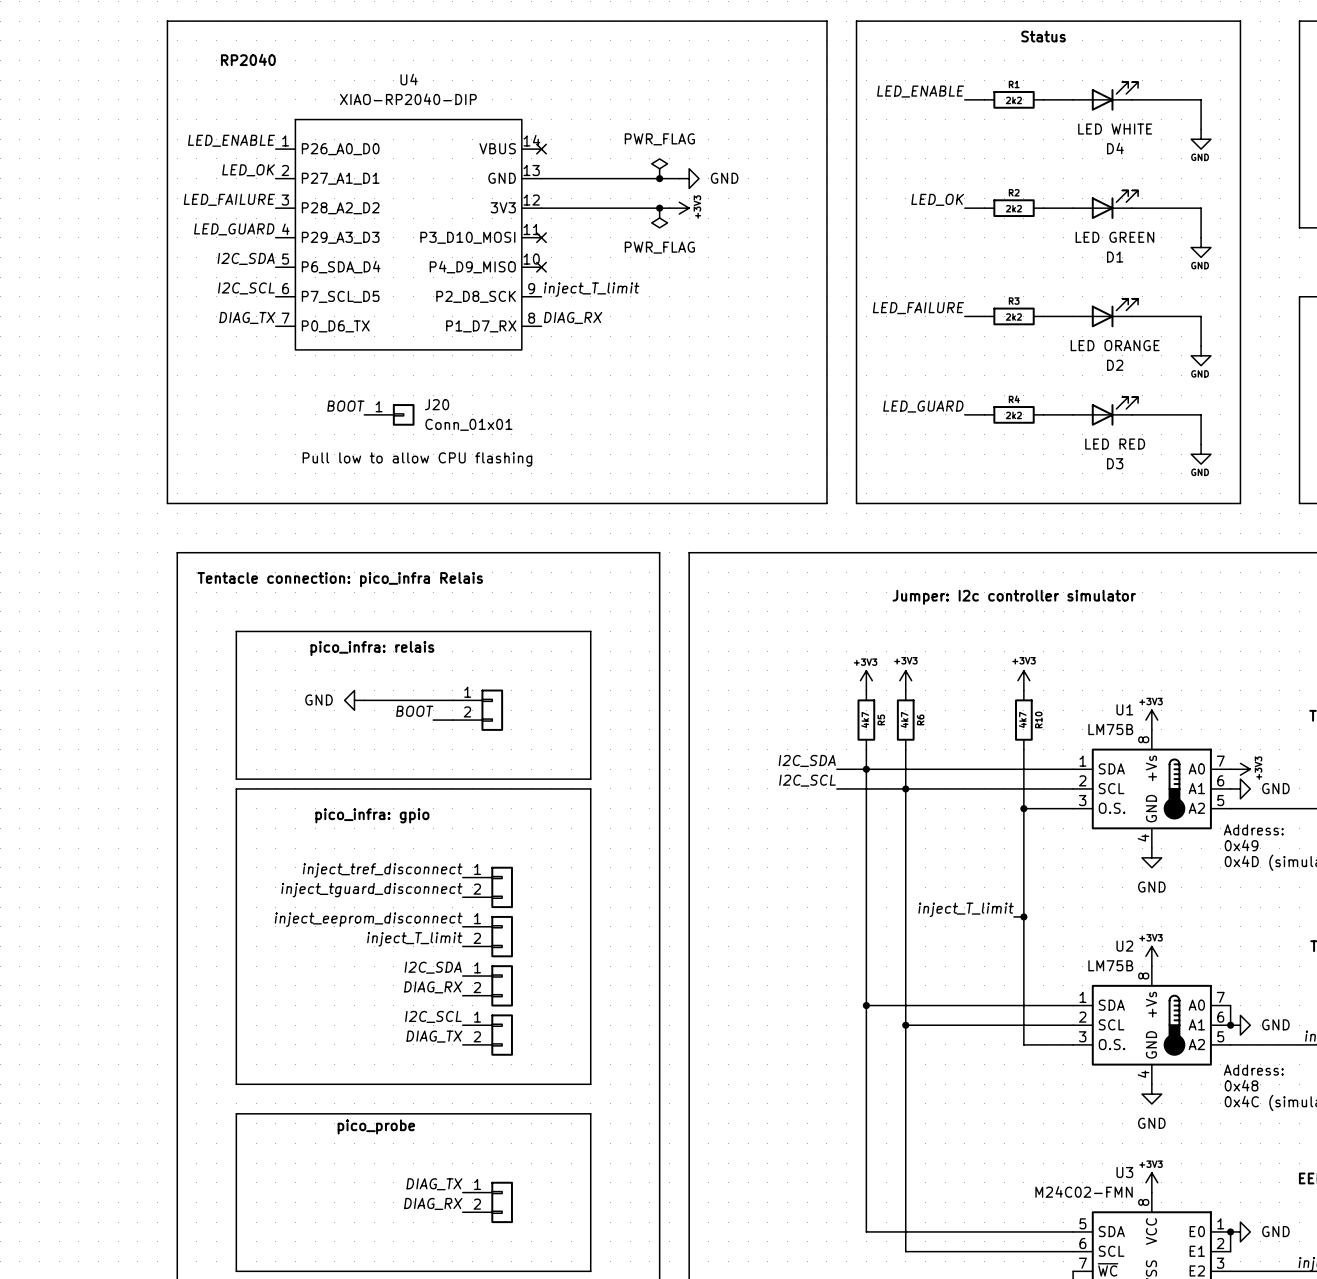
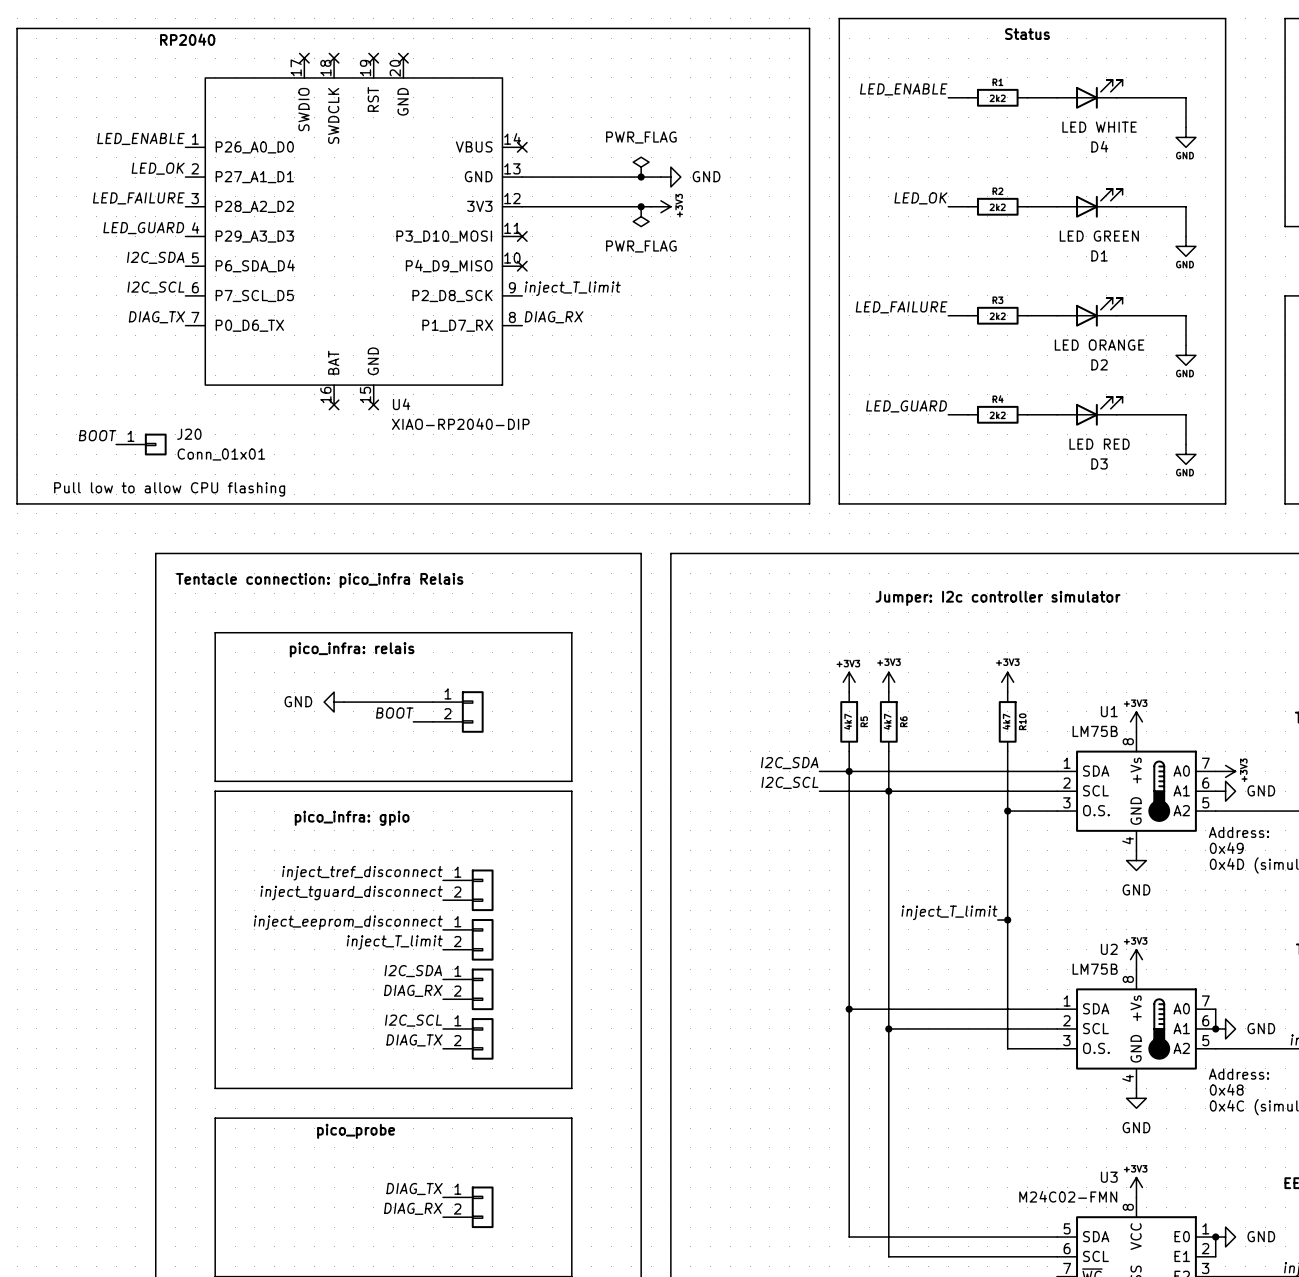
line: (826, 30) (826, 21) (167, 21) (167, 503) -> (809, 28) (17, 28) (17, 503) (145, 503)
text position: RP2040 (248, 59) -> RP2040 (187, 39)
no-connect mark: none -> (304, 58)
no-connect mark: none -> (334, 58)
no-connect mark: none -> (373, 58)
no-connect mark: none -> (403, 58)
U4 name position: U4 (409, 79) -> U4 (401, 404)
U4 value position: XIAO-RP2040-DIP (408, 99) -> XIAO-RP2040-DIP (460, 424)
U4 symbol: [275, 119, 542, 350] -> [185, 58, 523, 405]
label position: LED_ENABLE (231, 140) -> LED_ENABLE (140, 138)
label position: LED_OK (248, 170) -> LED_OK (158, 168)
label position: LED_FAILURE (229, 199) -> LED_FAILURE (138, 198)
label position: LED_GUARD (234, 229) -> LED_GUARD (143, 228)
label position: I2C_SDA (246, 258) -> I2C_SDA (155, 257)
label position: I2C_SCL (246, 288) -> I2C_SCL (155, 287)
label position: DIAG_TX (247, 317) -> DIAG_TX (157, 317)
no-connect mark: none -> (334, 404)
no-connect mark: none -> (373, 404)
label: BOOT (345, 406) -> none
J20 position: (389, 414) -> (141, 444)
label: none -> BOOT (97, 435)
text: Pull low to allow CPU flashing (417, 459) -> none
text: none -> Pull low to allow CPU flashing (169, 489)

